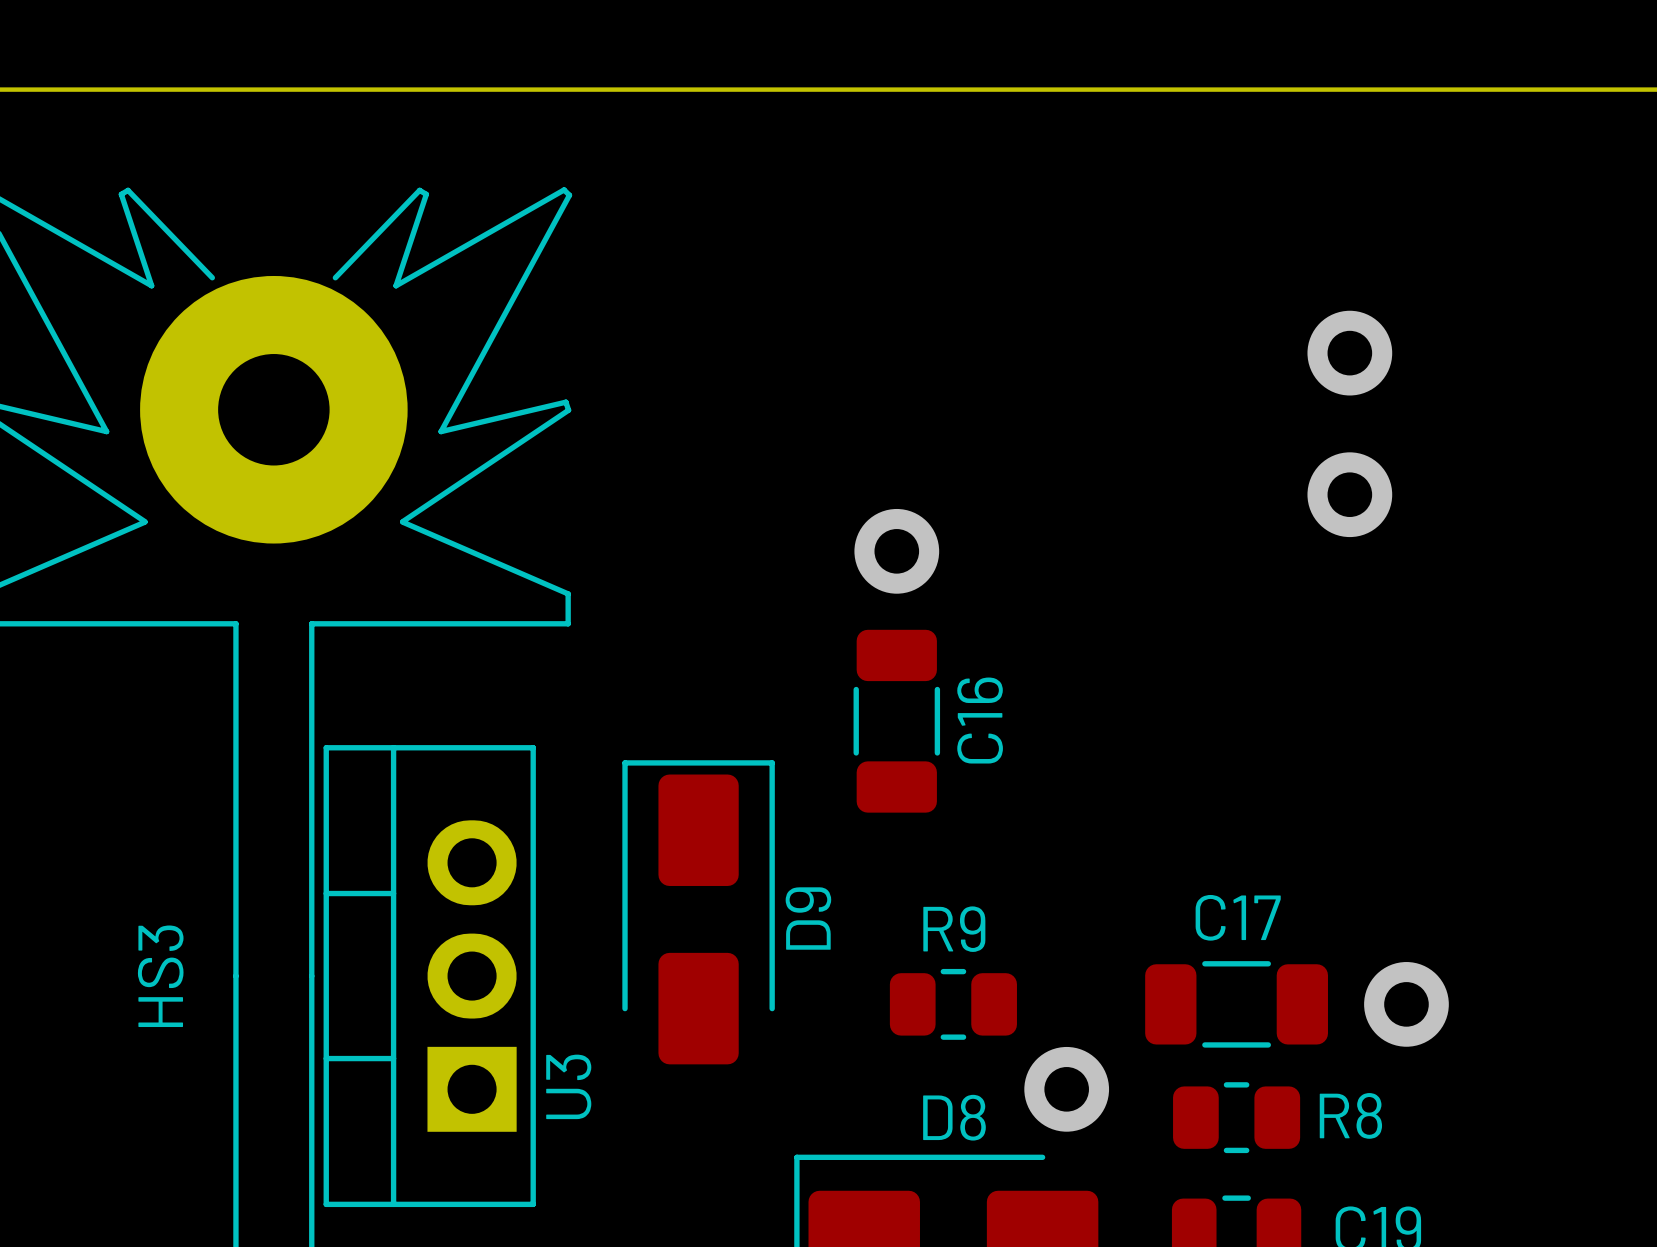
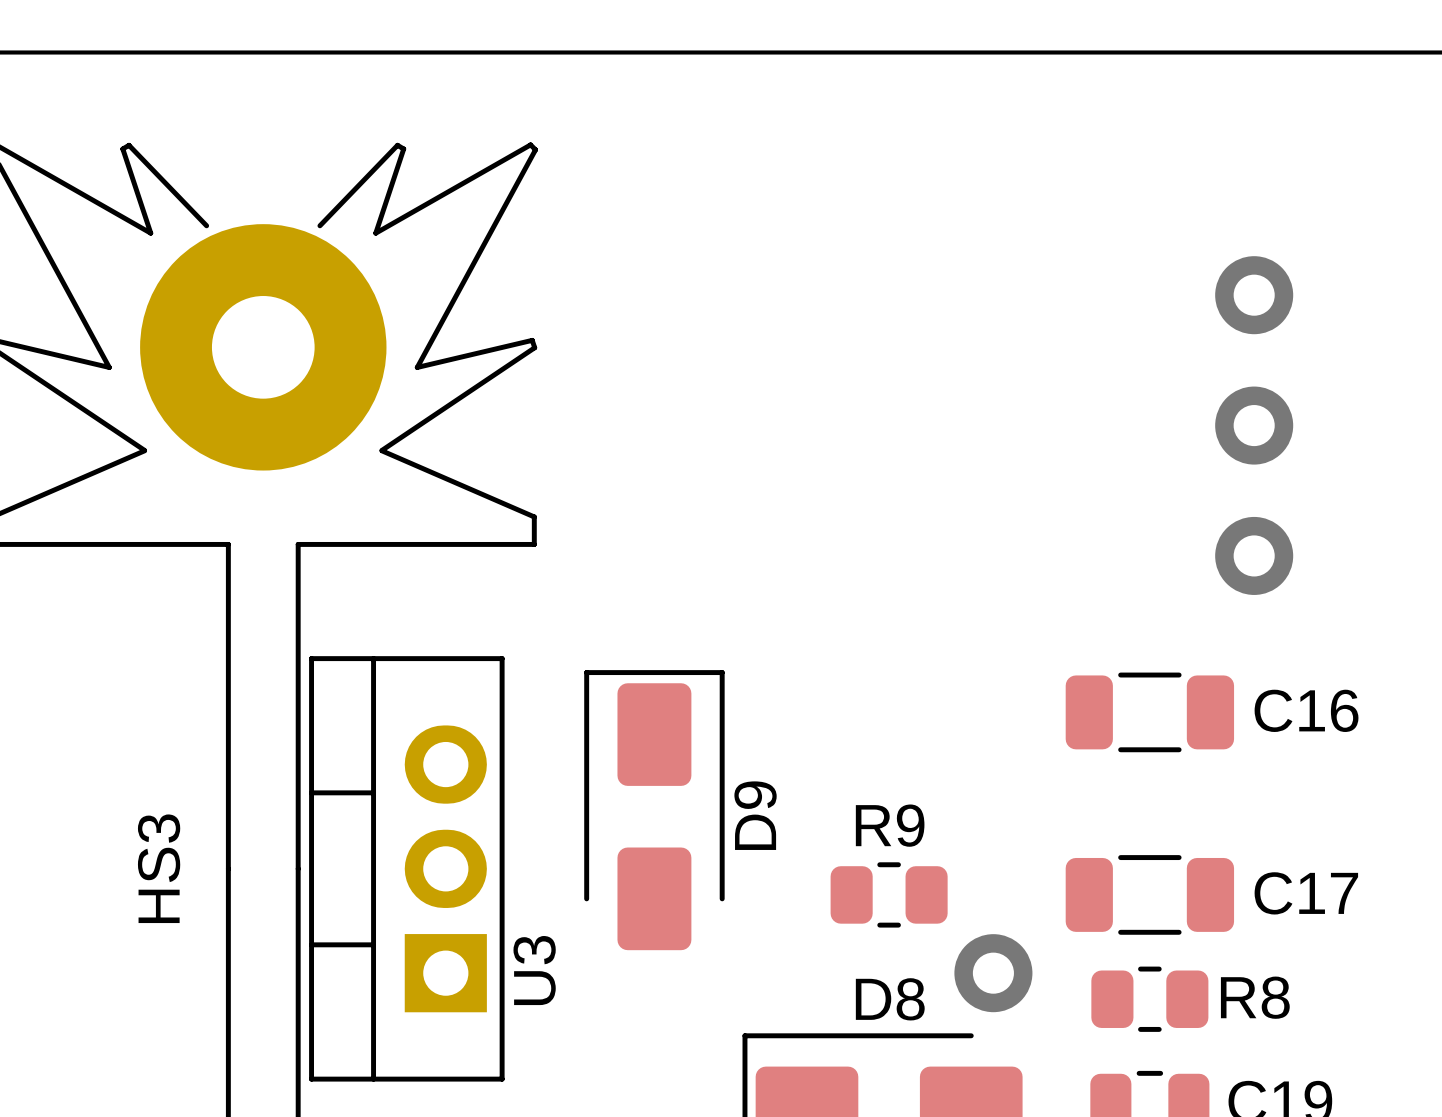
via: (896, 551) -> none
via: none -> (1254, 555)
C16 rotation: 0° (896, 721) -> 90° clockwise (1149, 712)
C16 position: (896, 721) -> (1149, 712)
C17 name position: C17 (1238, 917) -> C17 (1306, 893)
via: (1406, 1004) -> none

